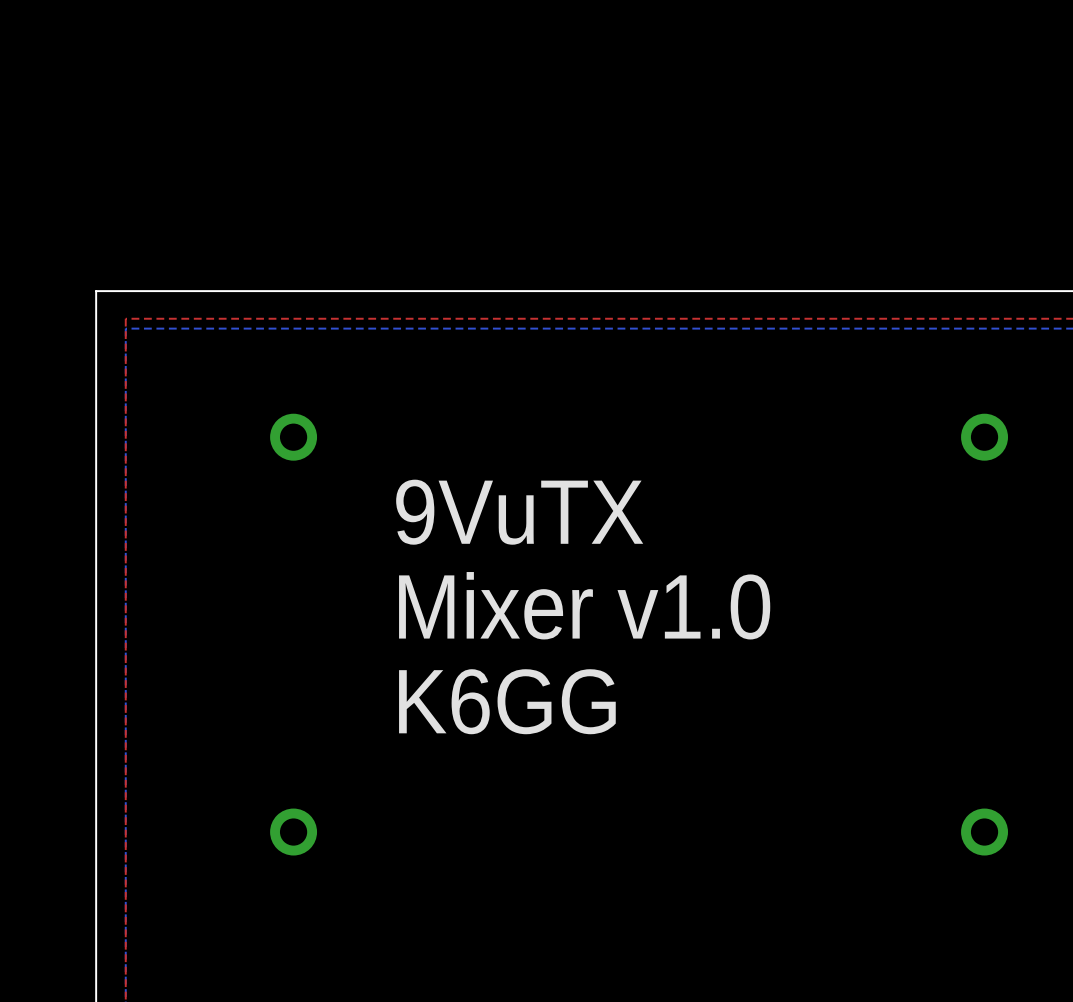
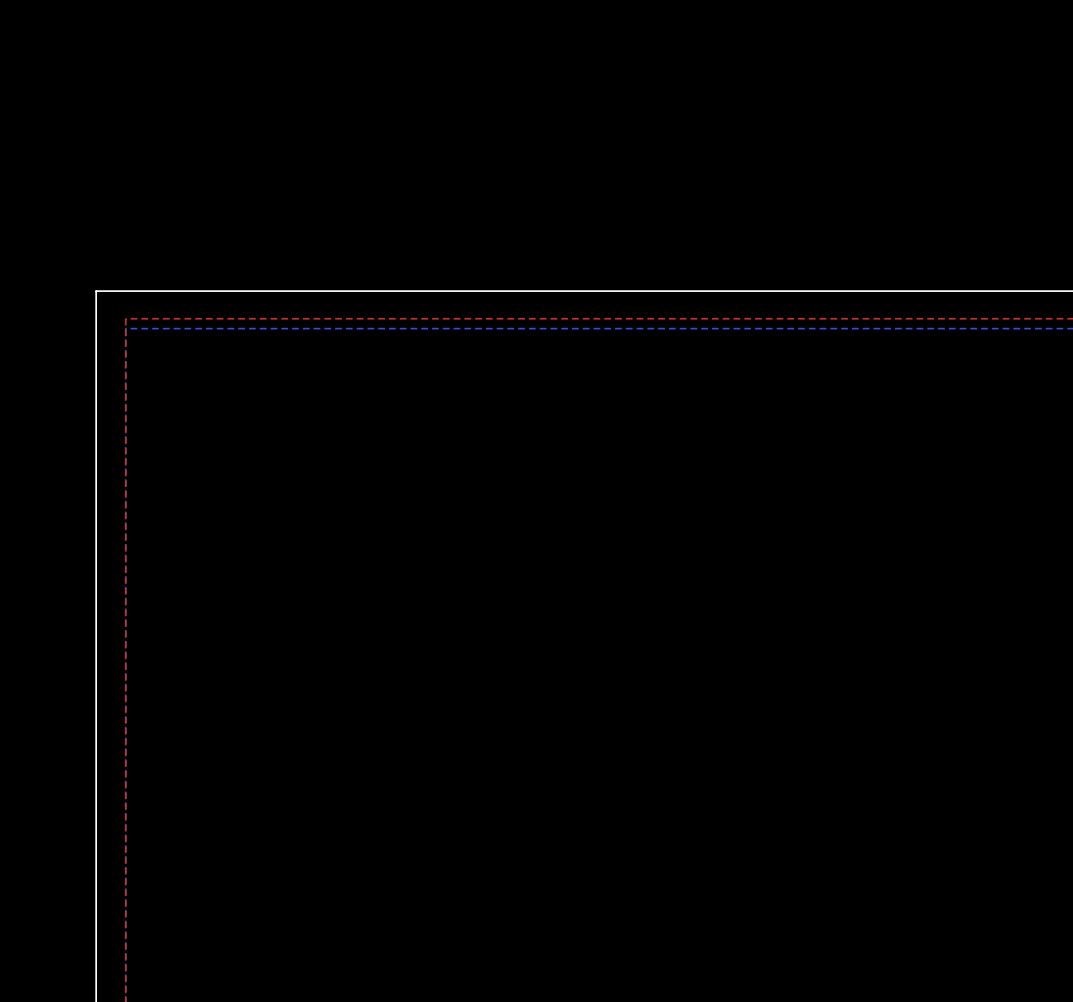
via: (293, 437) -> none
via: (984, 437) -> none
text: 9VuTX (519, 512) -> none
text: Mixer v1.0 (584, 605) -> none
text: K6GG (507, 701) -> none
via: (293, 832) -> none
via: (984, 832) -> none

